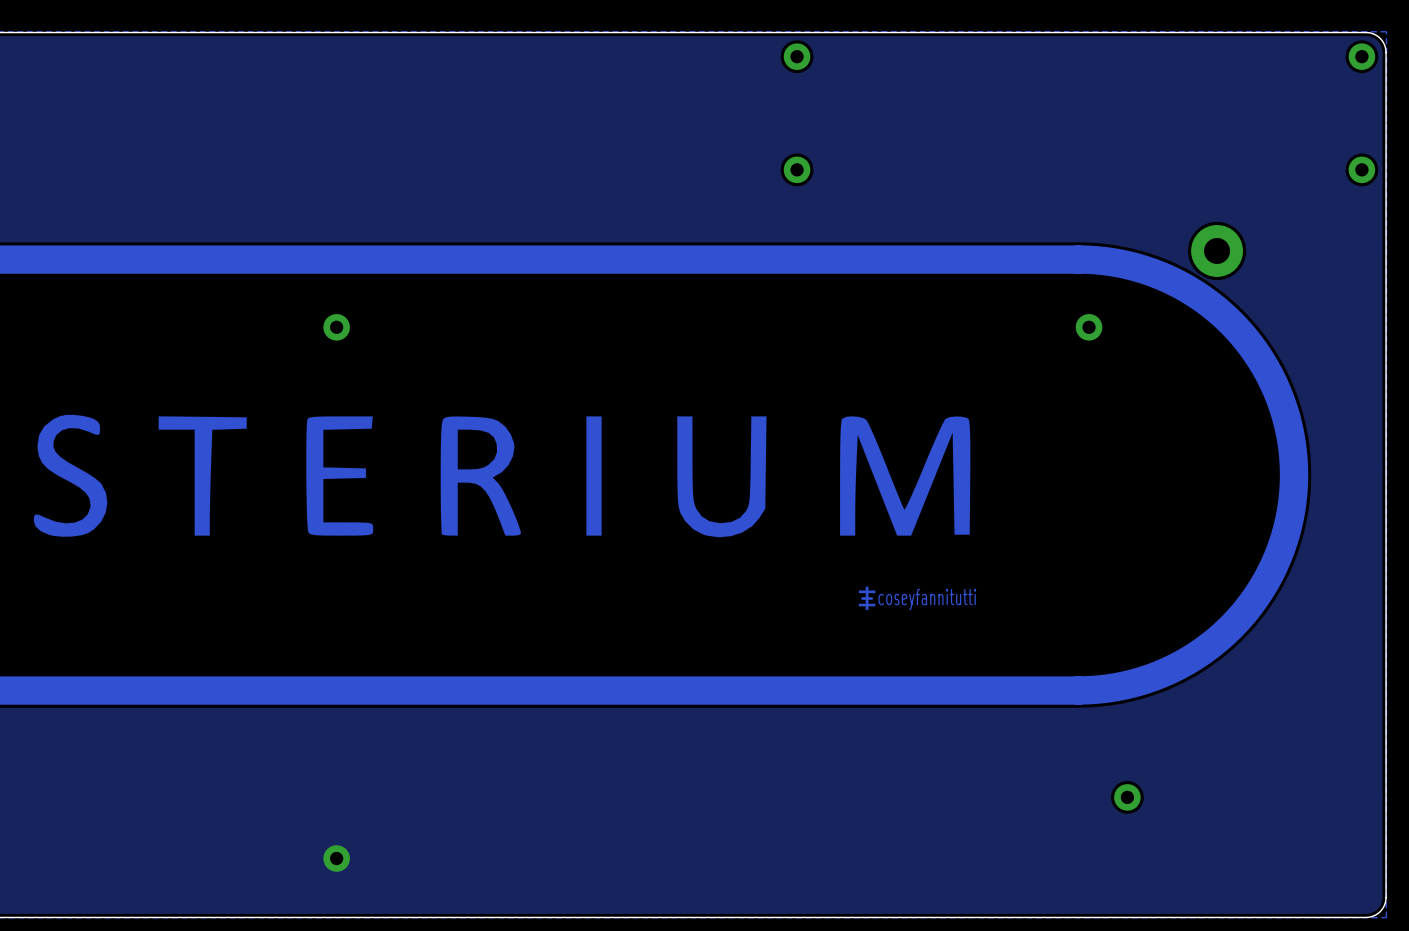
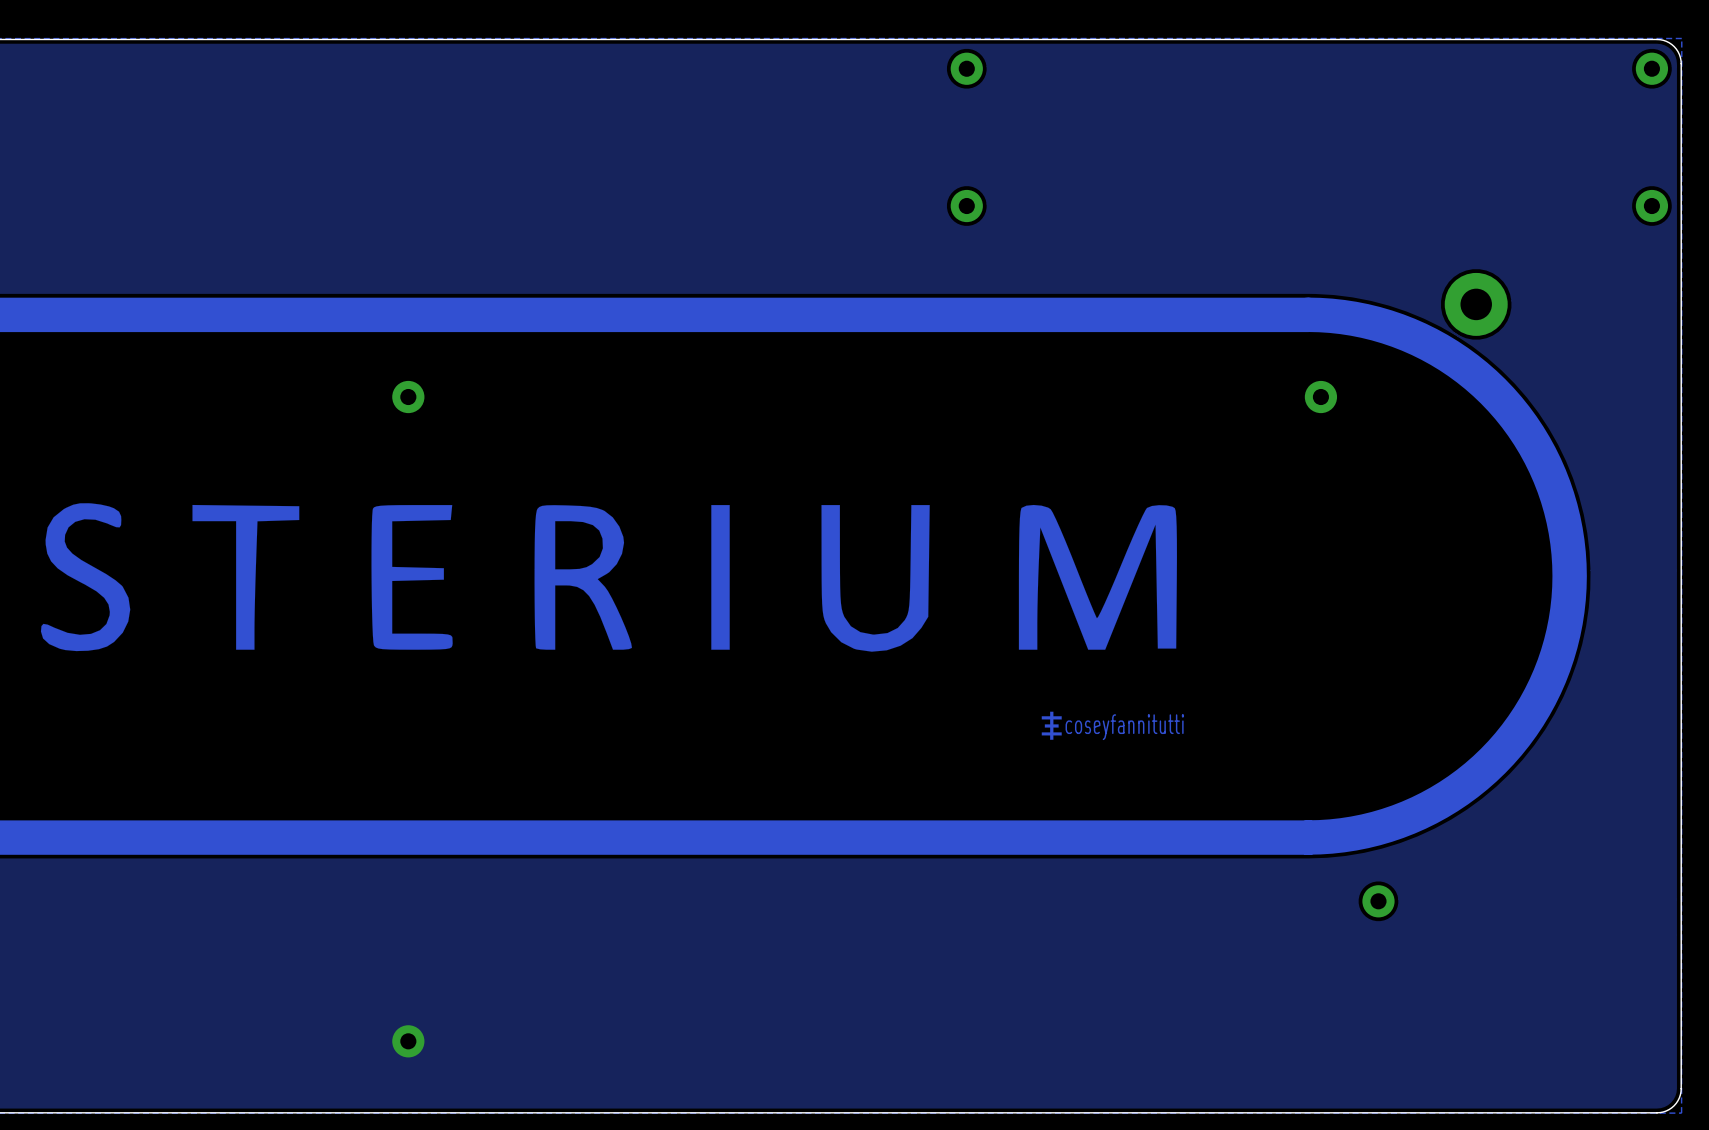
part position: (1127, 797) -> (1378, 901)

